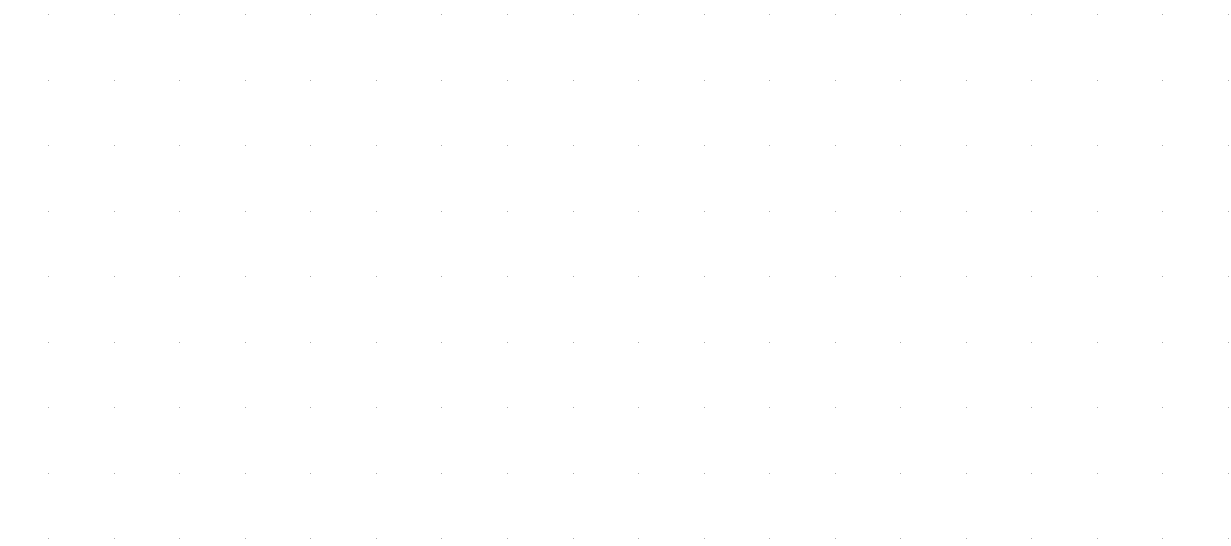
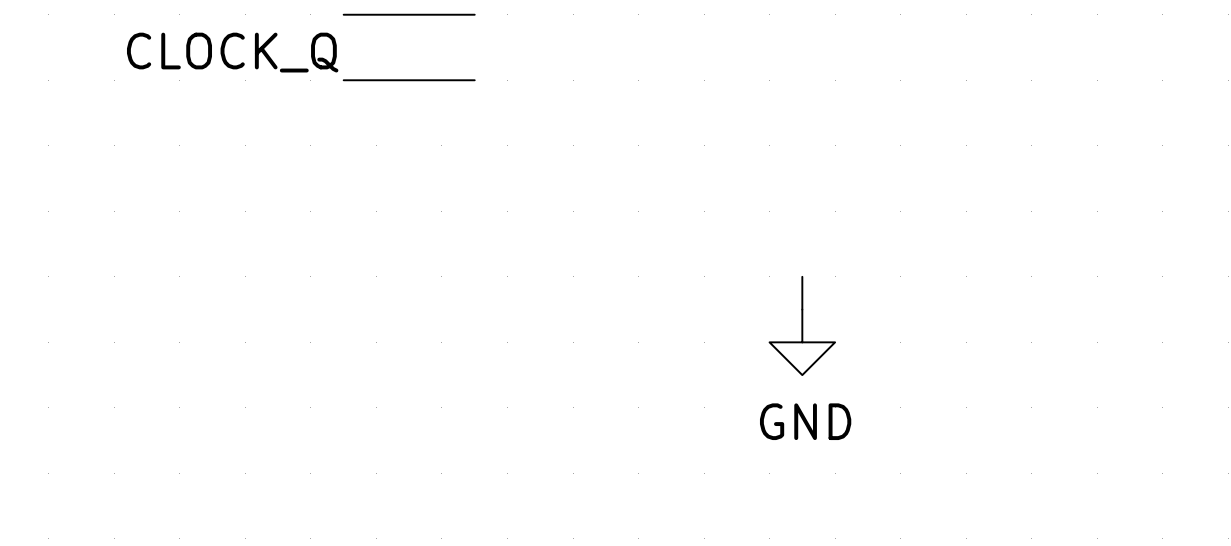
wire: none -> (343, 14) (474, 14)
label: none -> CLOCK_Q (232, 52)
wire: none -> (343, 80) (474, 80)
wire: none -> (802, 276) (802, 309)
power symbol: none -> GND (802, 342)

